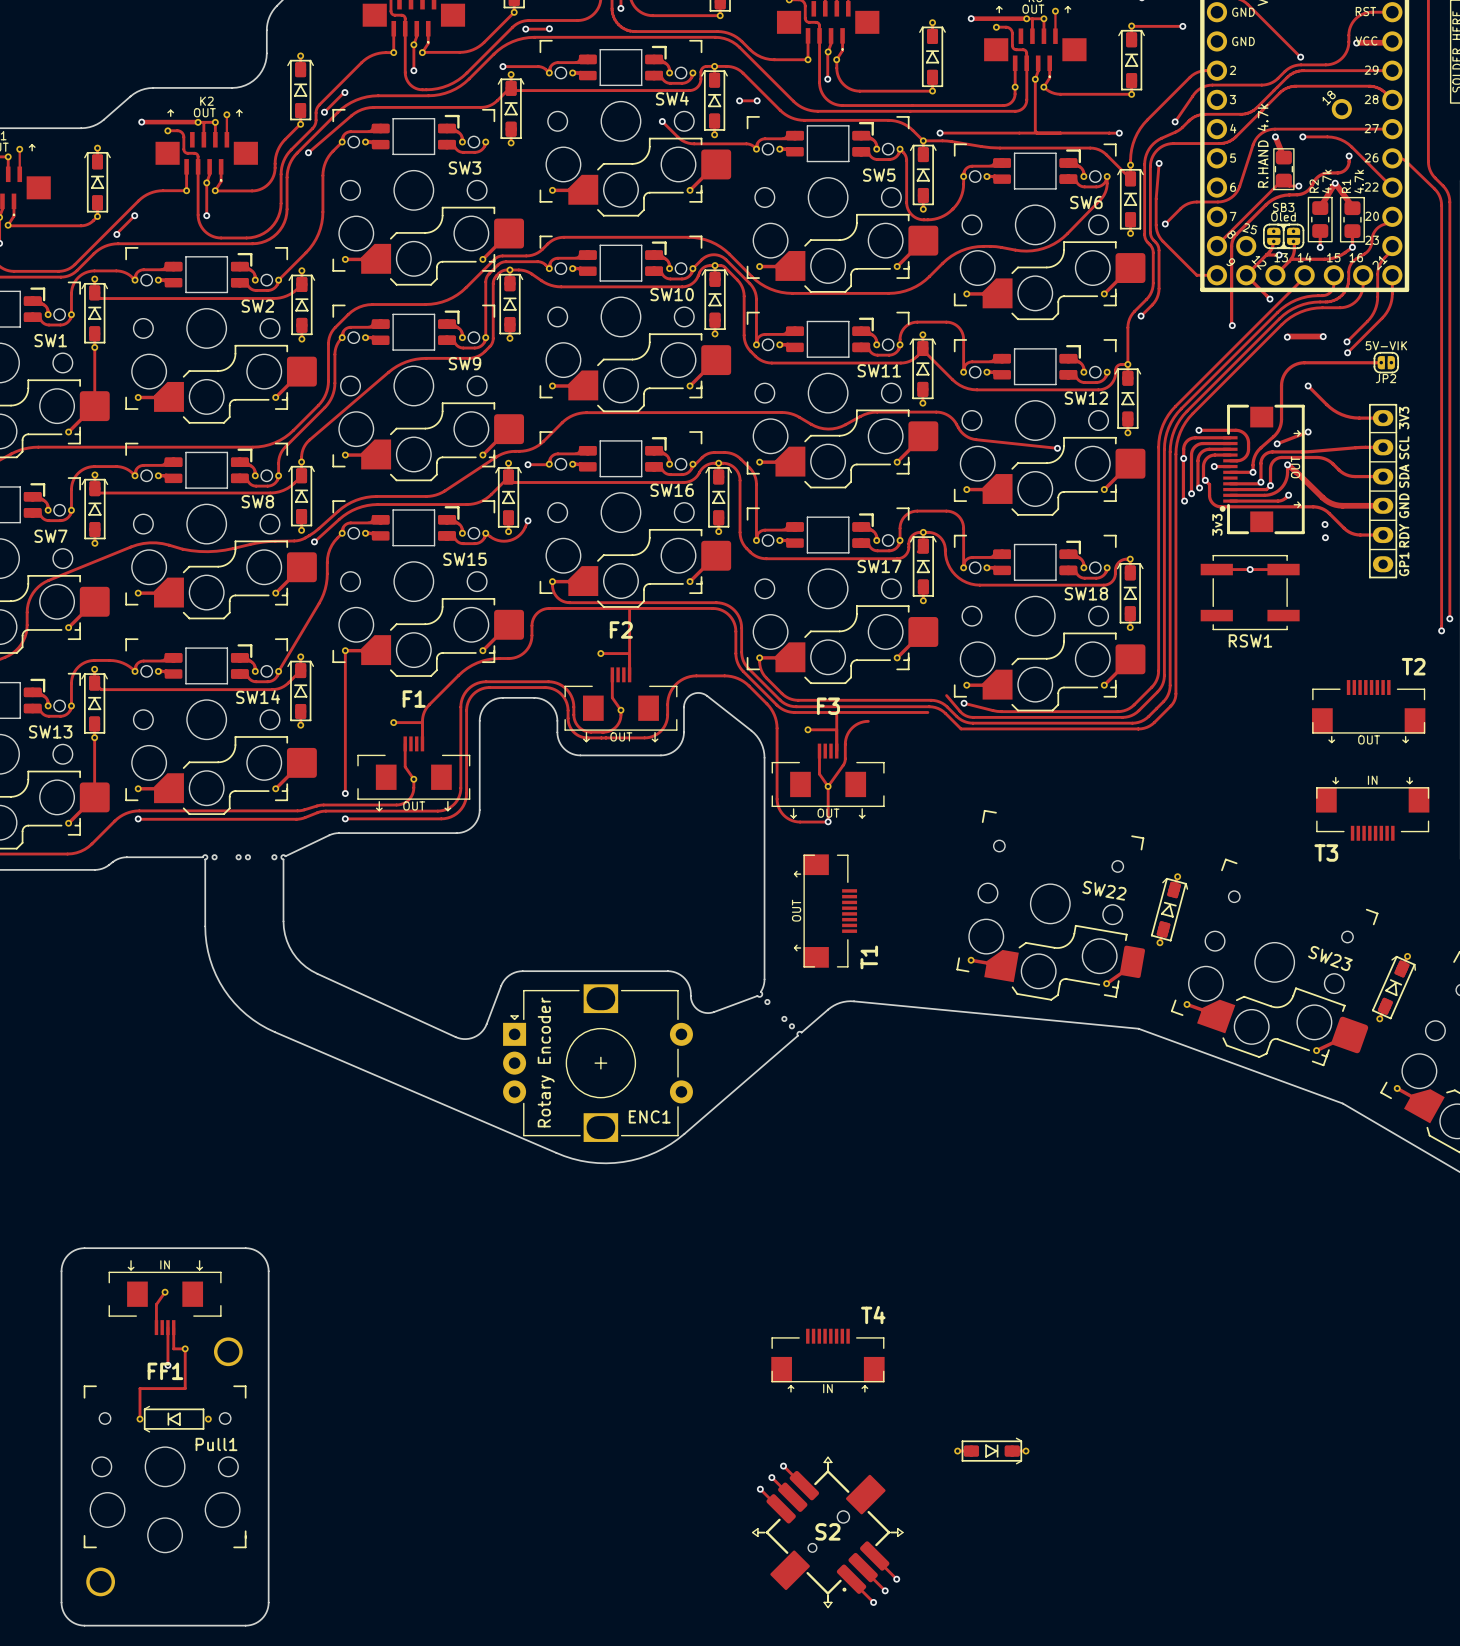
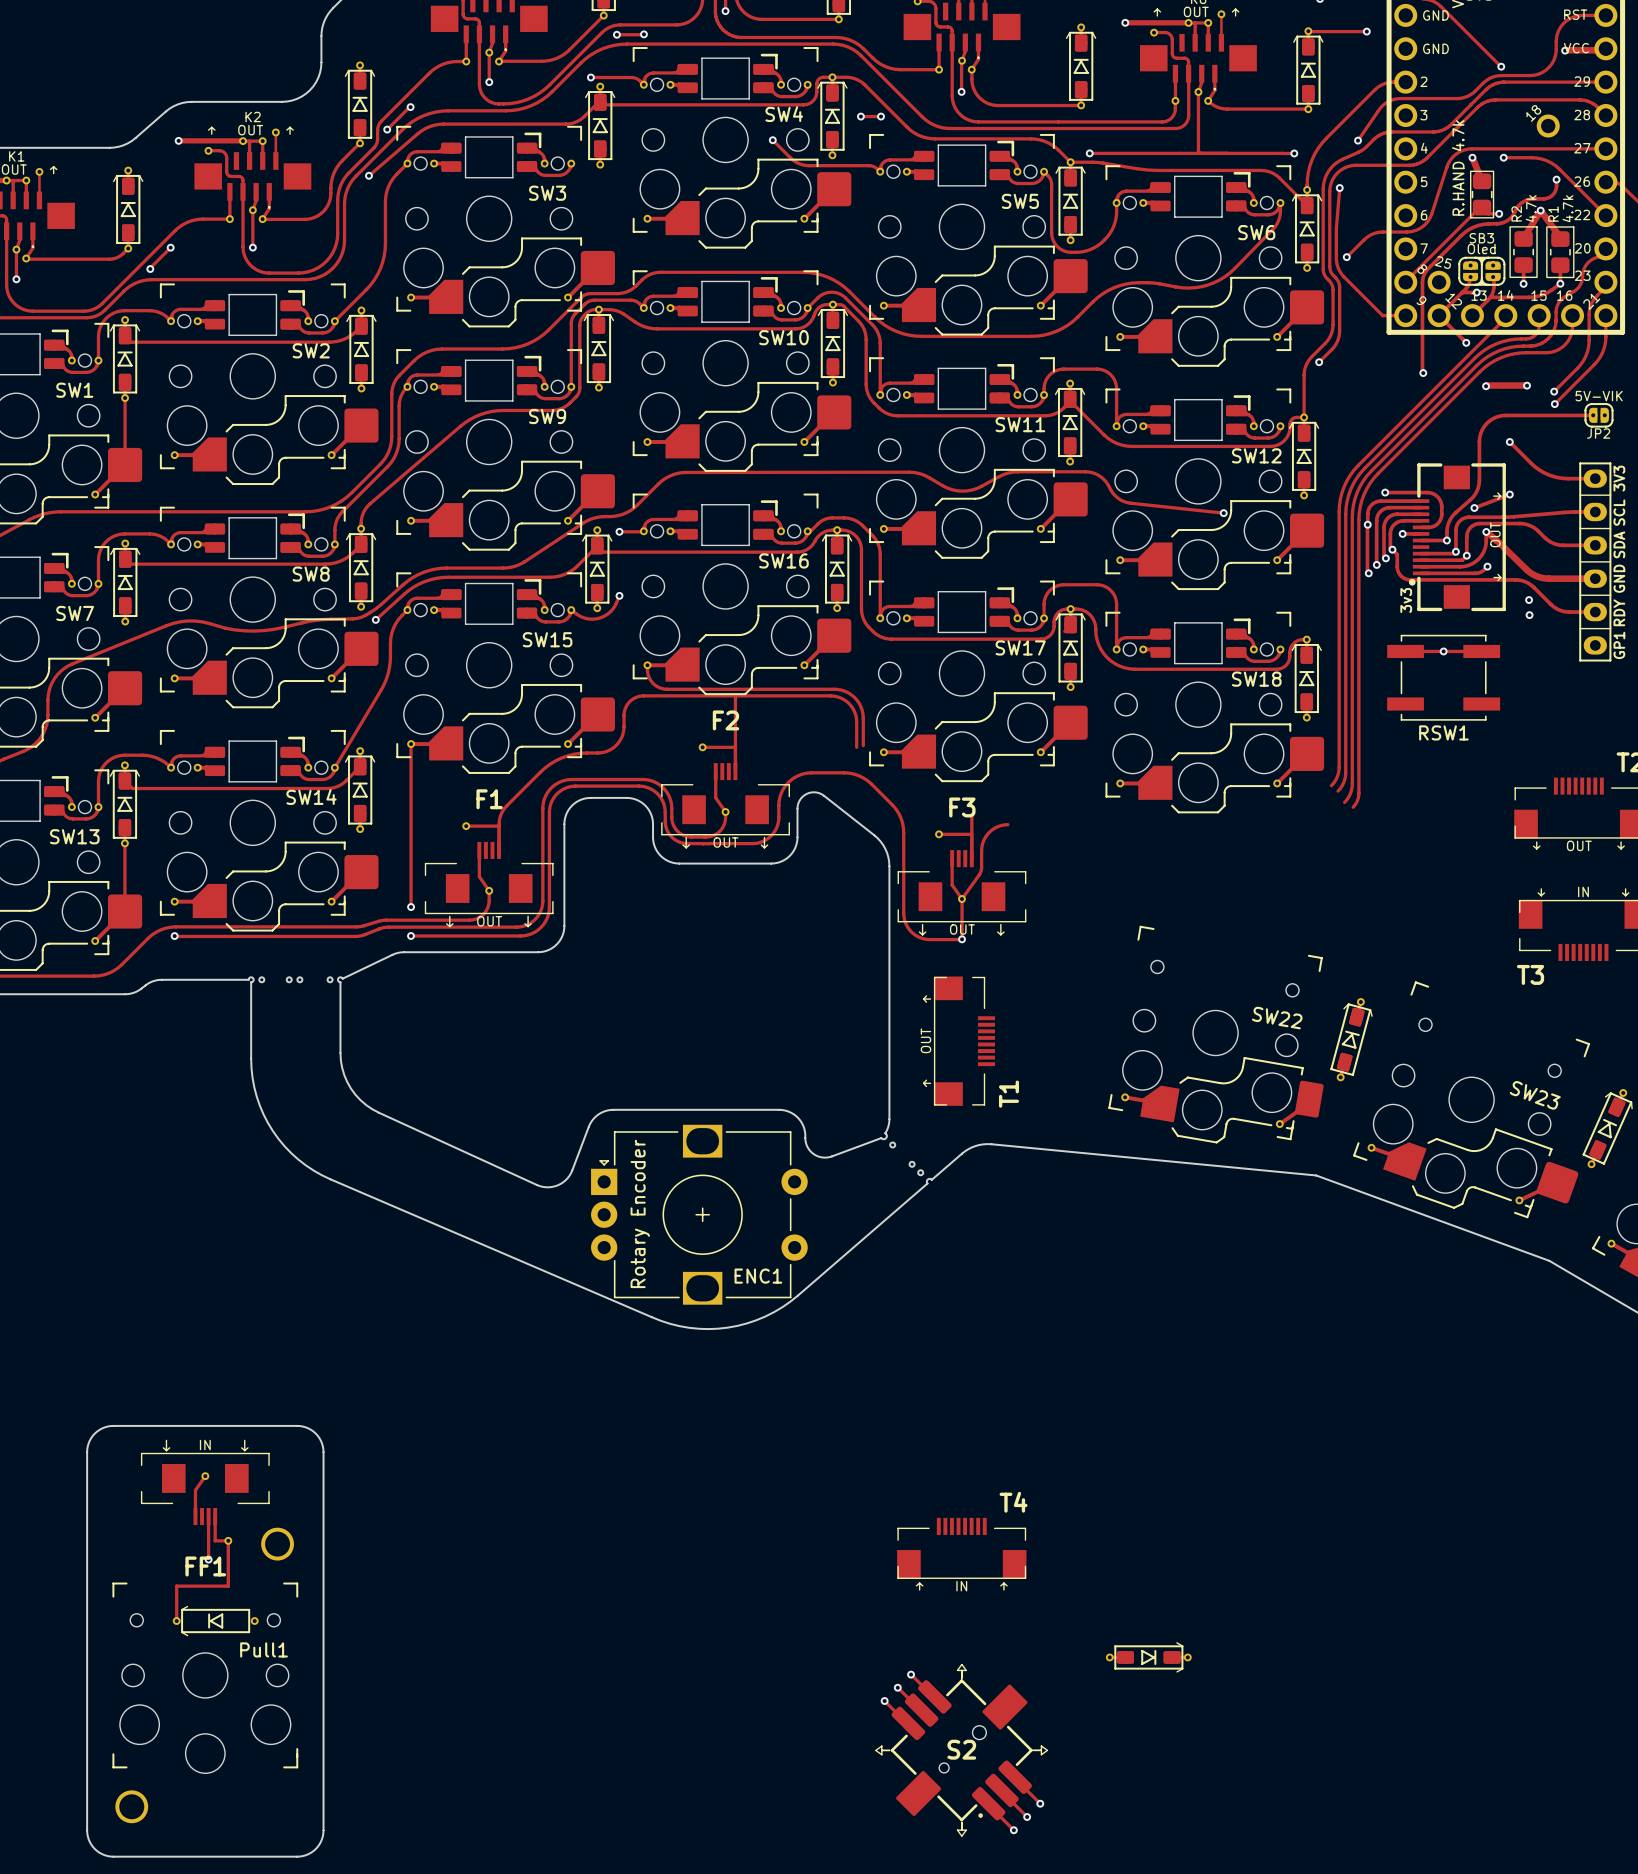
track: (741, 652) (743, 660) (748, 668) (782, 701) (793, 706) (932, 706) (943, 711) (961, 728) (1138, 728) -> none
track: (735, 653) (741, 669) (776, 705) (787, 711) (927, 712) -> none
track: (759, 657) (760, 667) (764, 675) (783, 695) (791, 699) (934, 700) (945, 705) (960, 719) (970, 723) (1135, 722) (1146, 718) (1163, 701) -> none
track: (1151, 687) (1131, 706) (1120, 711) (1001, 711) (964, 703) -> none
track: (1157, 691) (1136, 712) (1122, 717) (971, 717) (961, 712) (946, 695) -> none
via: (964, 703) -> none
track: (1170, 706) (1152, 724) (1138, 729) -> none

